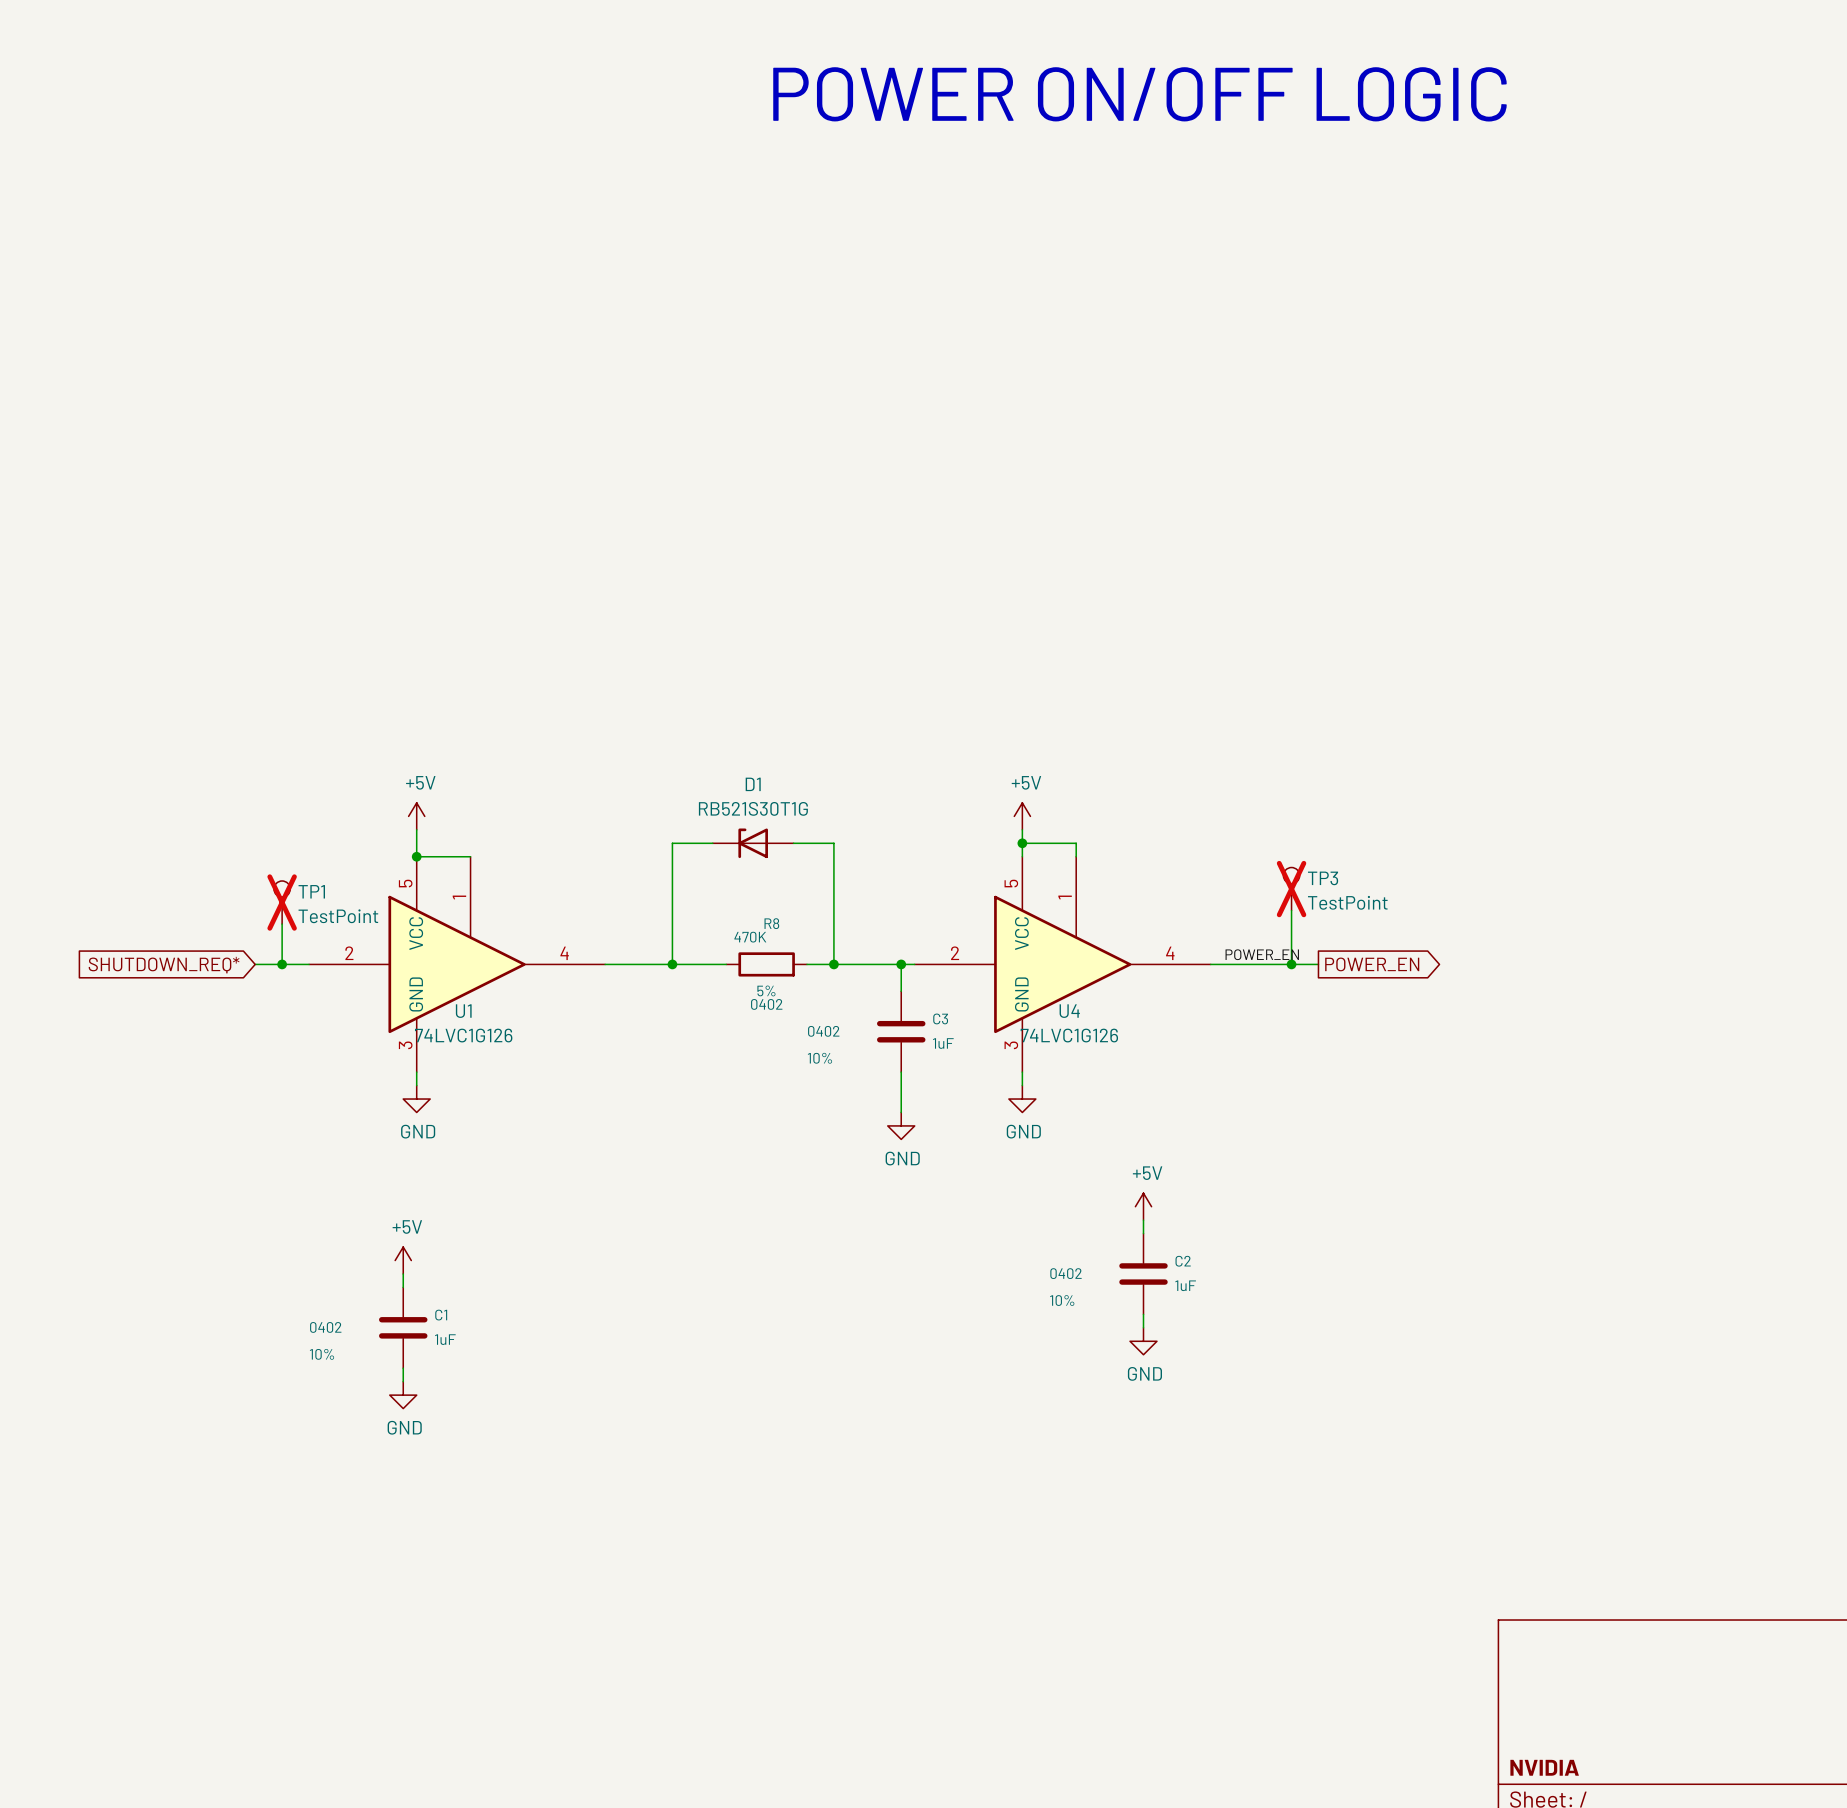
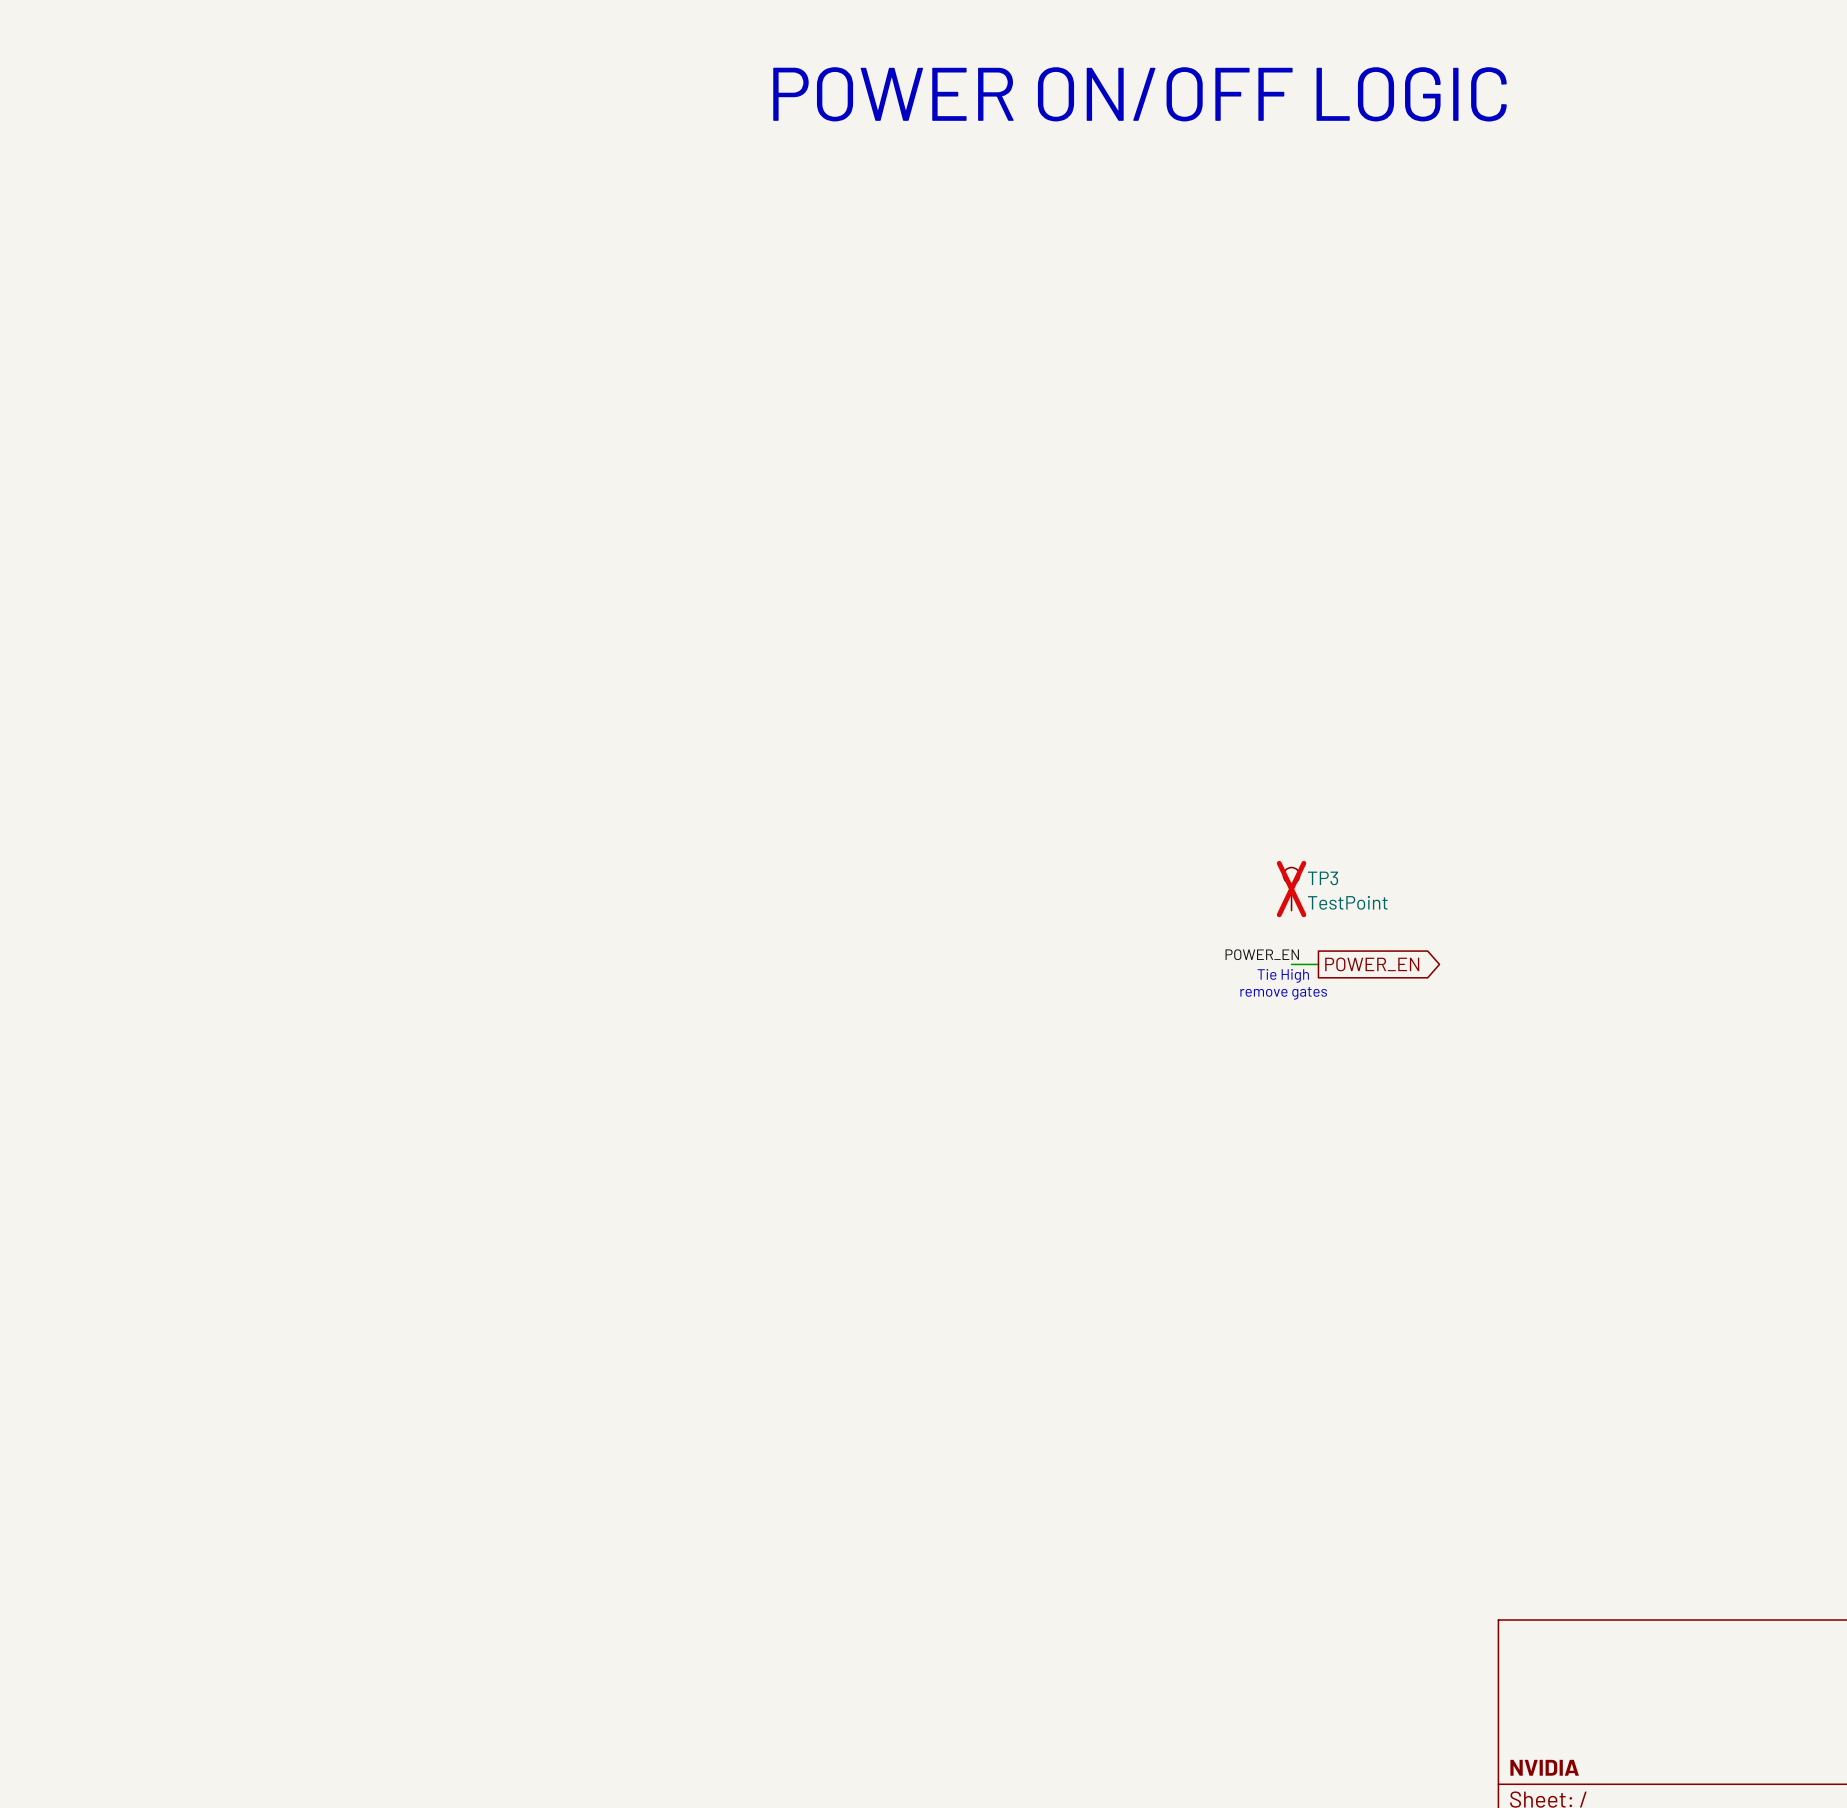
power symbol: +5V (416, 816) -> none
power symbol: +5V (1022, 816) -> none
wire: (416, 829) (416, 856) (470, 856) -> none
wire: (1022, 829) (1022, 856) -> none
wire: (712, 843) (672, 843) (672, 964) -> none
D1: RB521S30T1G (753, 843) -> none
wire: (793, 843) (833, 843) (833, 964) -> none
wire: (1022, 843) (1076, 843) (1076, 856) -> none
junction: (1022, 843) -> none
junction: (416, 856) -> none
TP1: TestPoint (282, 902) -> none
wire: (1291, 910) (1291, 964) (1210, 964) -> none
wire: (282, 924) (282, 964) -> none
wire: (255, 964) (309, 964) -> none
junction: (282, 964) -> none
U1: 74LVC1G126 (457, 964) -> none
wire: (605, 964) (726, 964) -> none
junction: (672, 964) -> none
R8: 470K (766, 964) -> none
wire: (807, 964) (914, 964) -> none
junction: (833, 964) -> none
wire: (901, 964) (901, 991) -> none
junction: (901, 964) -> none
U4: 74LVC1G126 (1062, 964) -> none
junction: (1291, 964) -> none
global label: SHUTDOWN_REQ* (164, 965) -> none
text: none -> Tie High (1283, 975)
text: none -> remove gates (1283, 993)
C3: 1uF (901, 1031) -> none
wire: (416, 1072) (416, 1085) -> none
wire: (901, 1072) (901, 1112) -> none
wire: (1022, 1072) (1022, 1085) -> none
power symbol: GND (416, 1099) -> none
power symbol: GND (1022, 1099) -> none
power symbol: GND (901, 1125) -> none
power symbol: +5V (1143, 1206) -> none
wire: (1143, 1220) (1143, 1233) -> none
power symbol: +5V (403, 1260) -> none
wire: (403, 1273) (403, 1287) -> none
C2: 1uF (1143, 1273) -> none
wire: (1143, 1314) (1143, 1327) -> none
C1: 1uF (403, 1327) -> none
power symbol: GND (1143, 1341) -> none
wire: (403, 1368) (403, 1381) -> none
power symbol: GND (403, 1395) -> none

